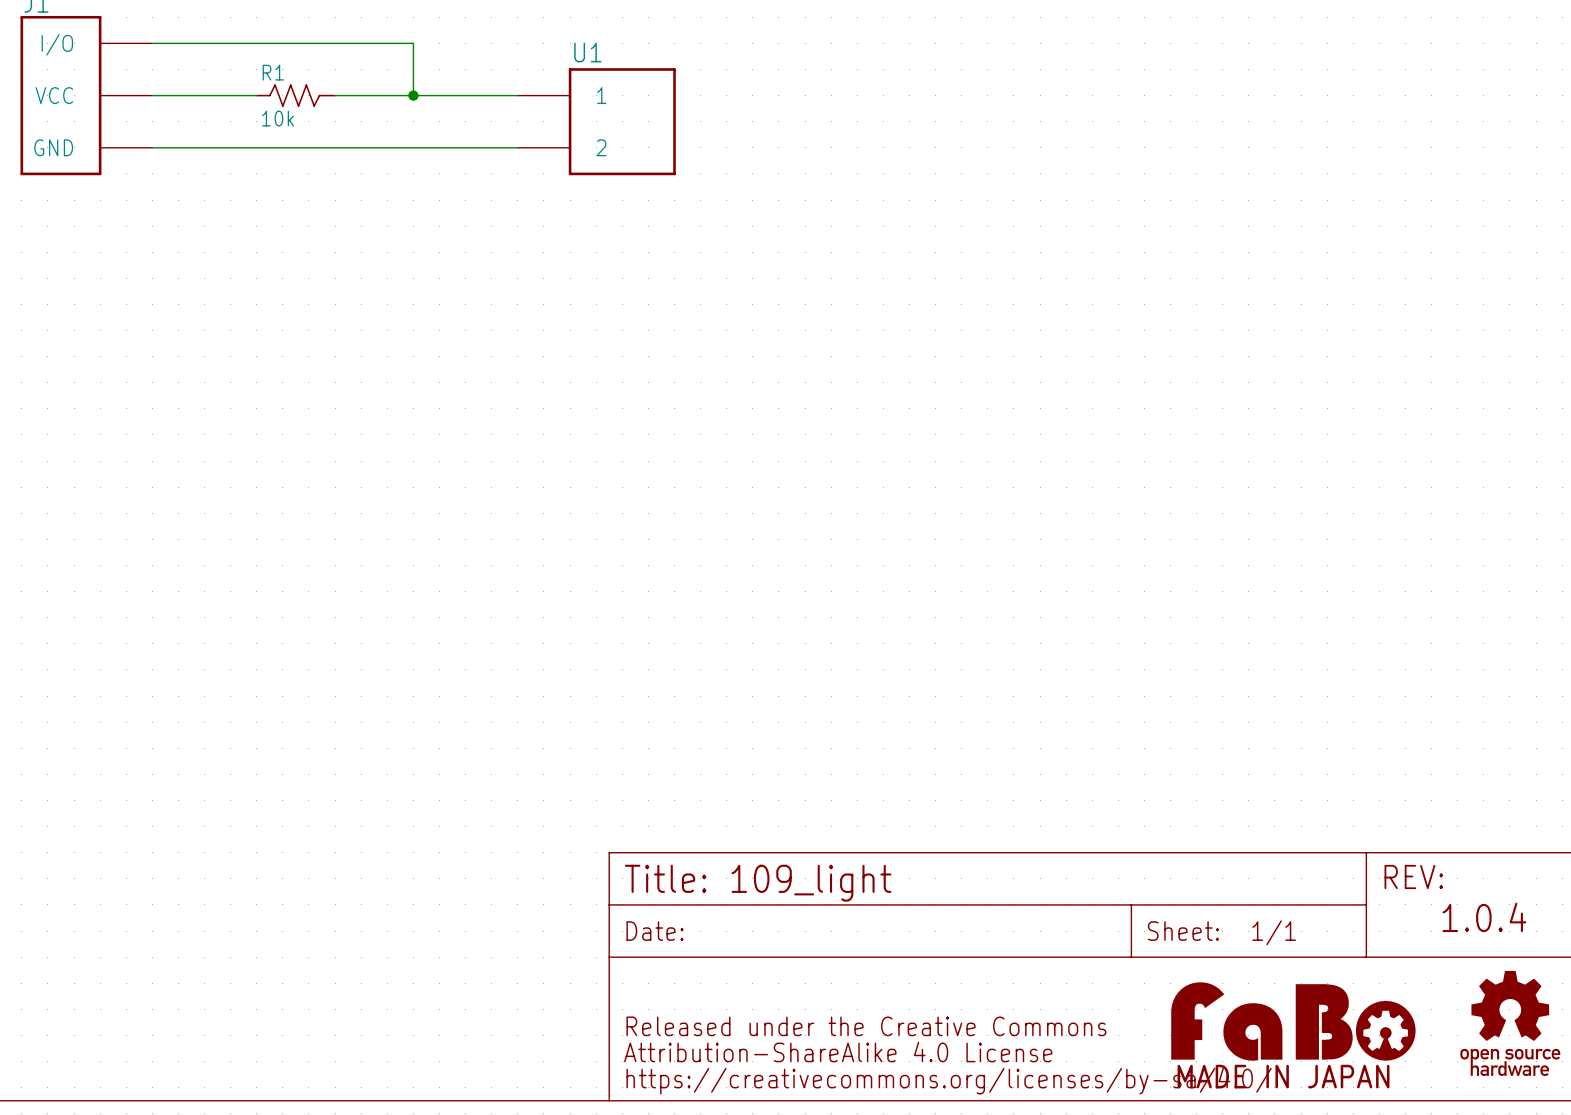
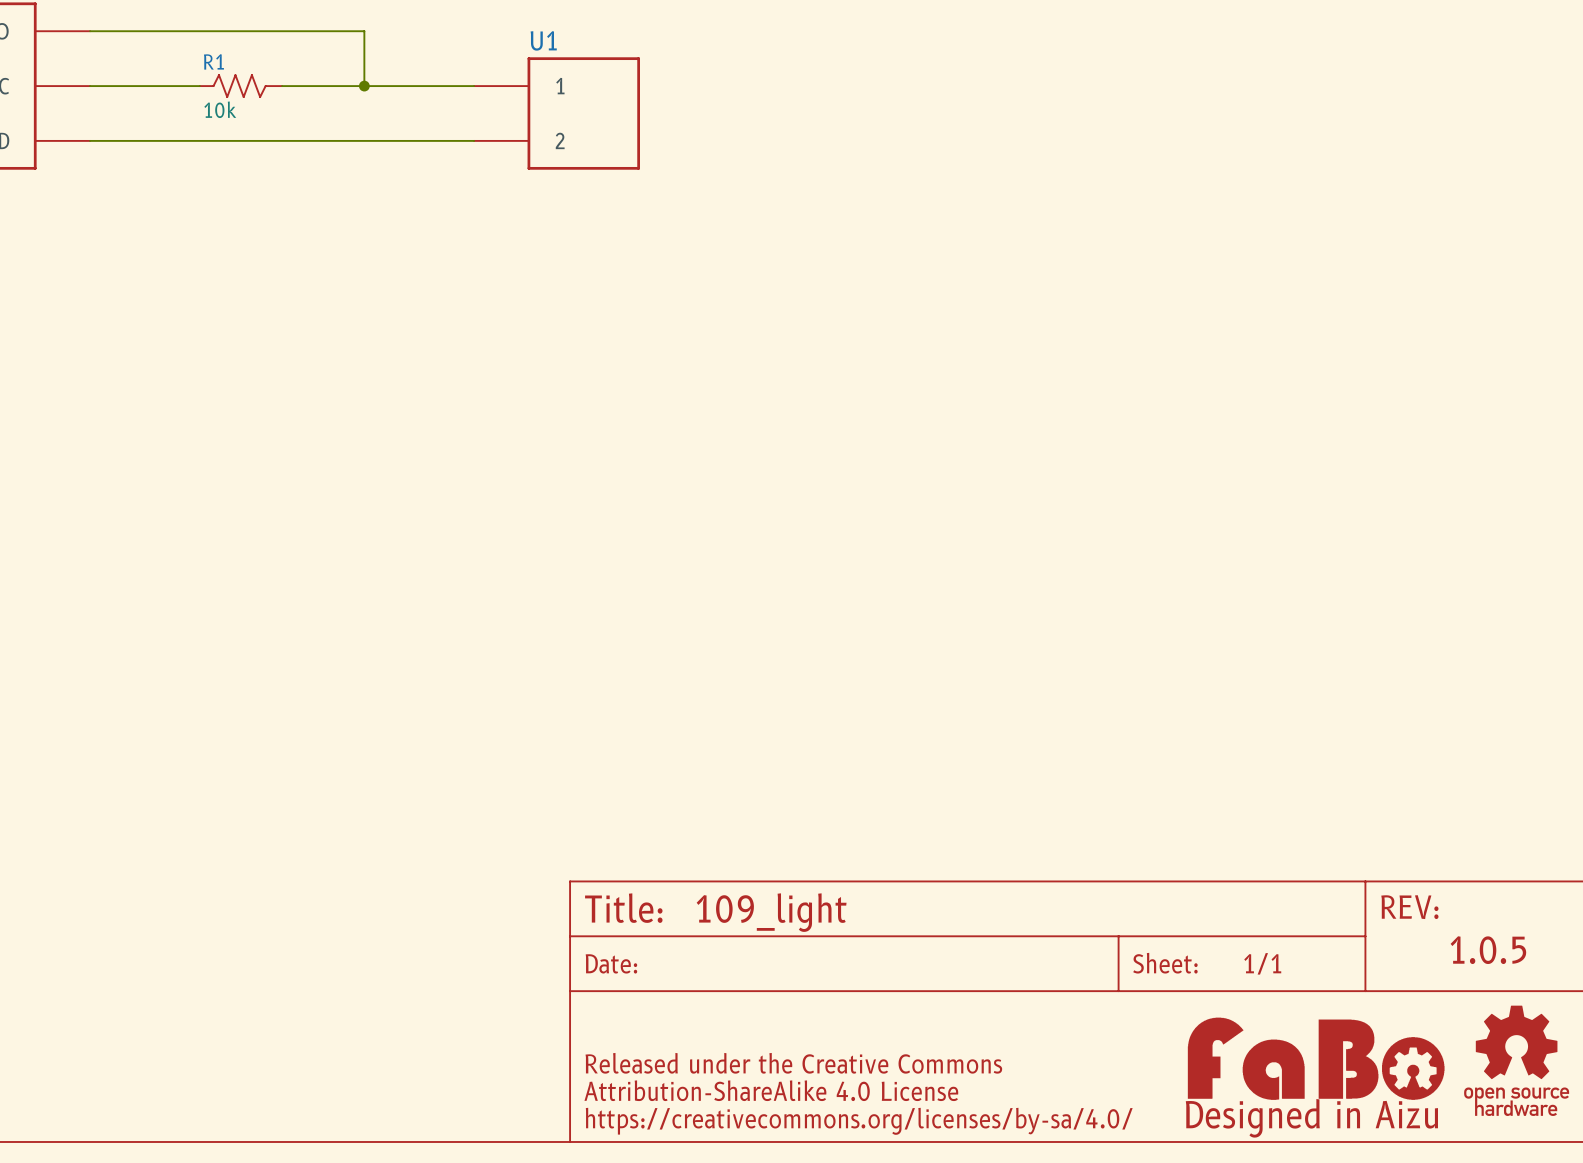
text: 1.0.4 (1484, 917) -> 1.0.5 (1488, 950)
part: (1293, 1021) -> none
part: none -> (1316, 1058)

